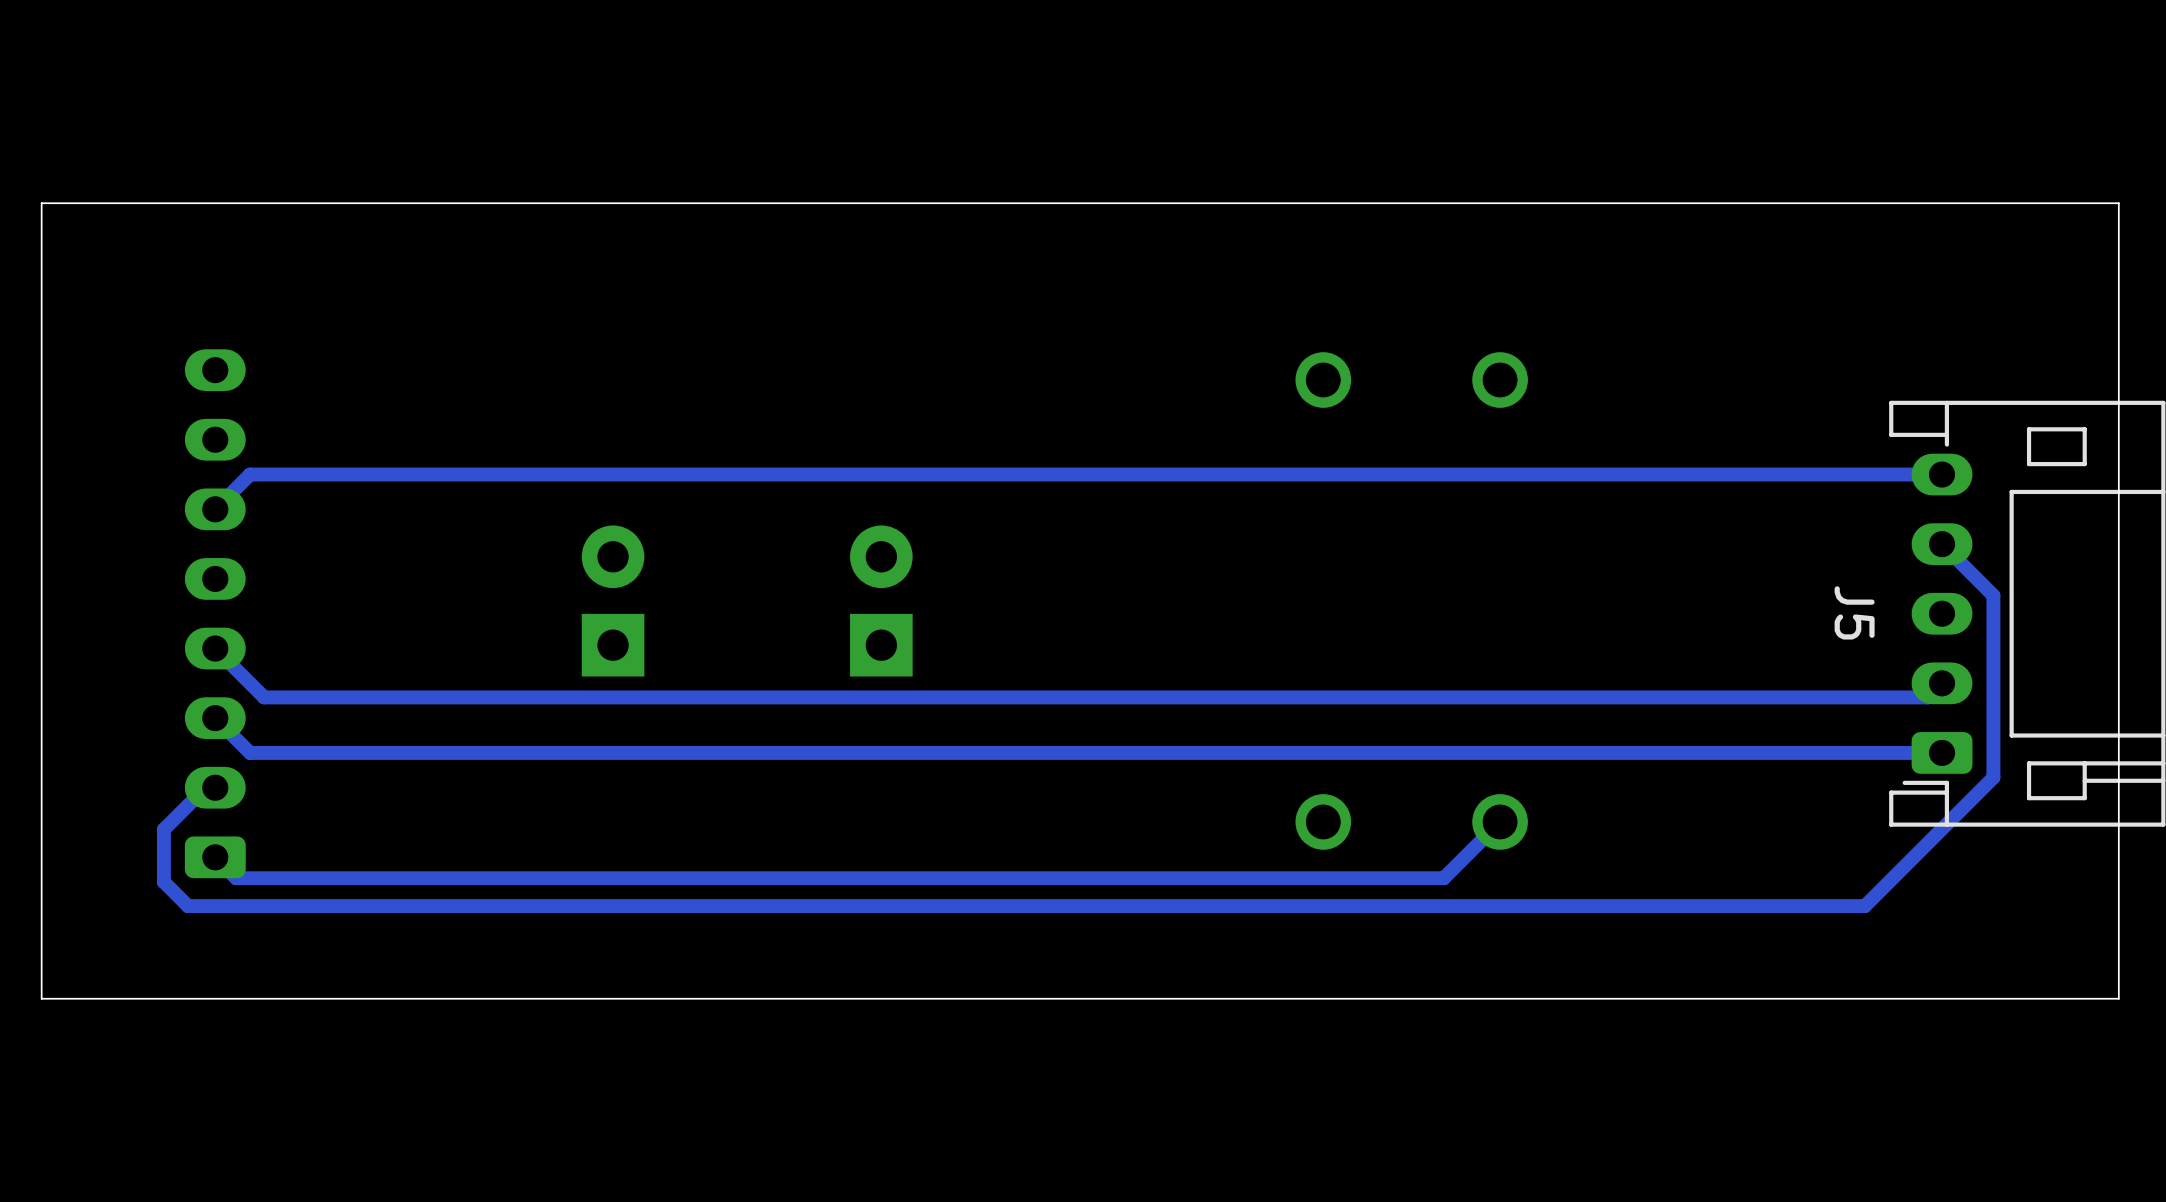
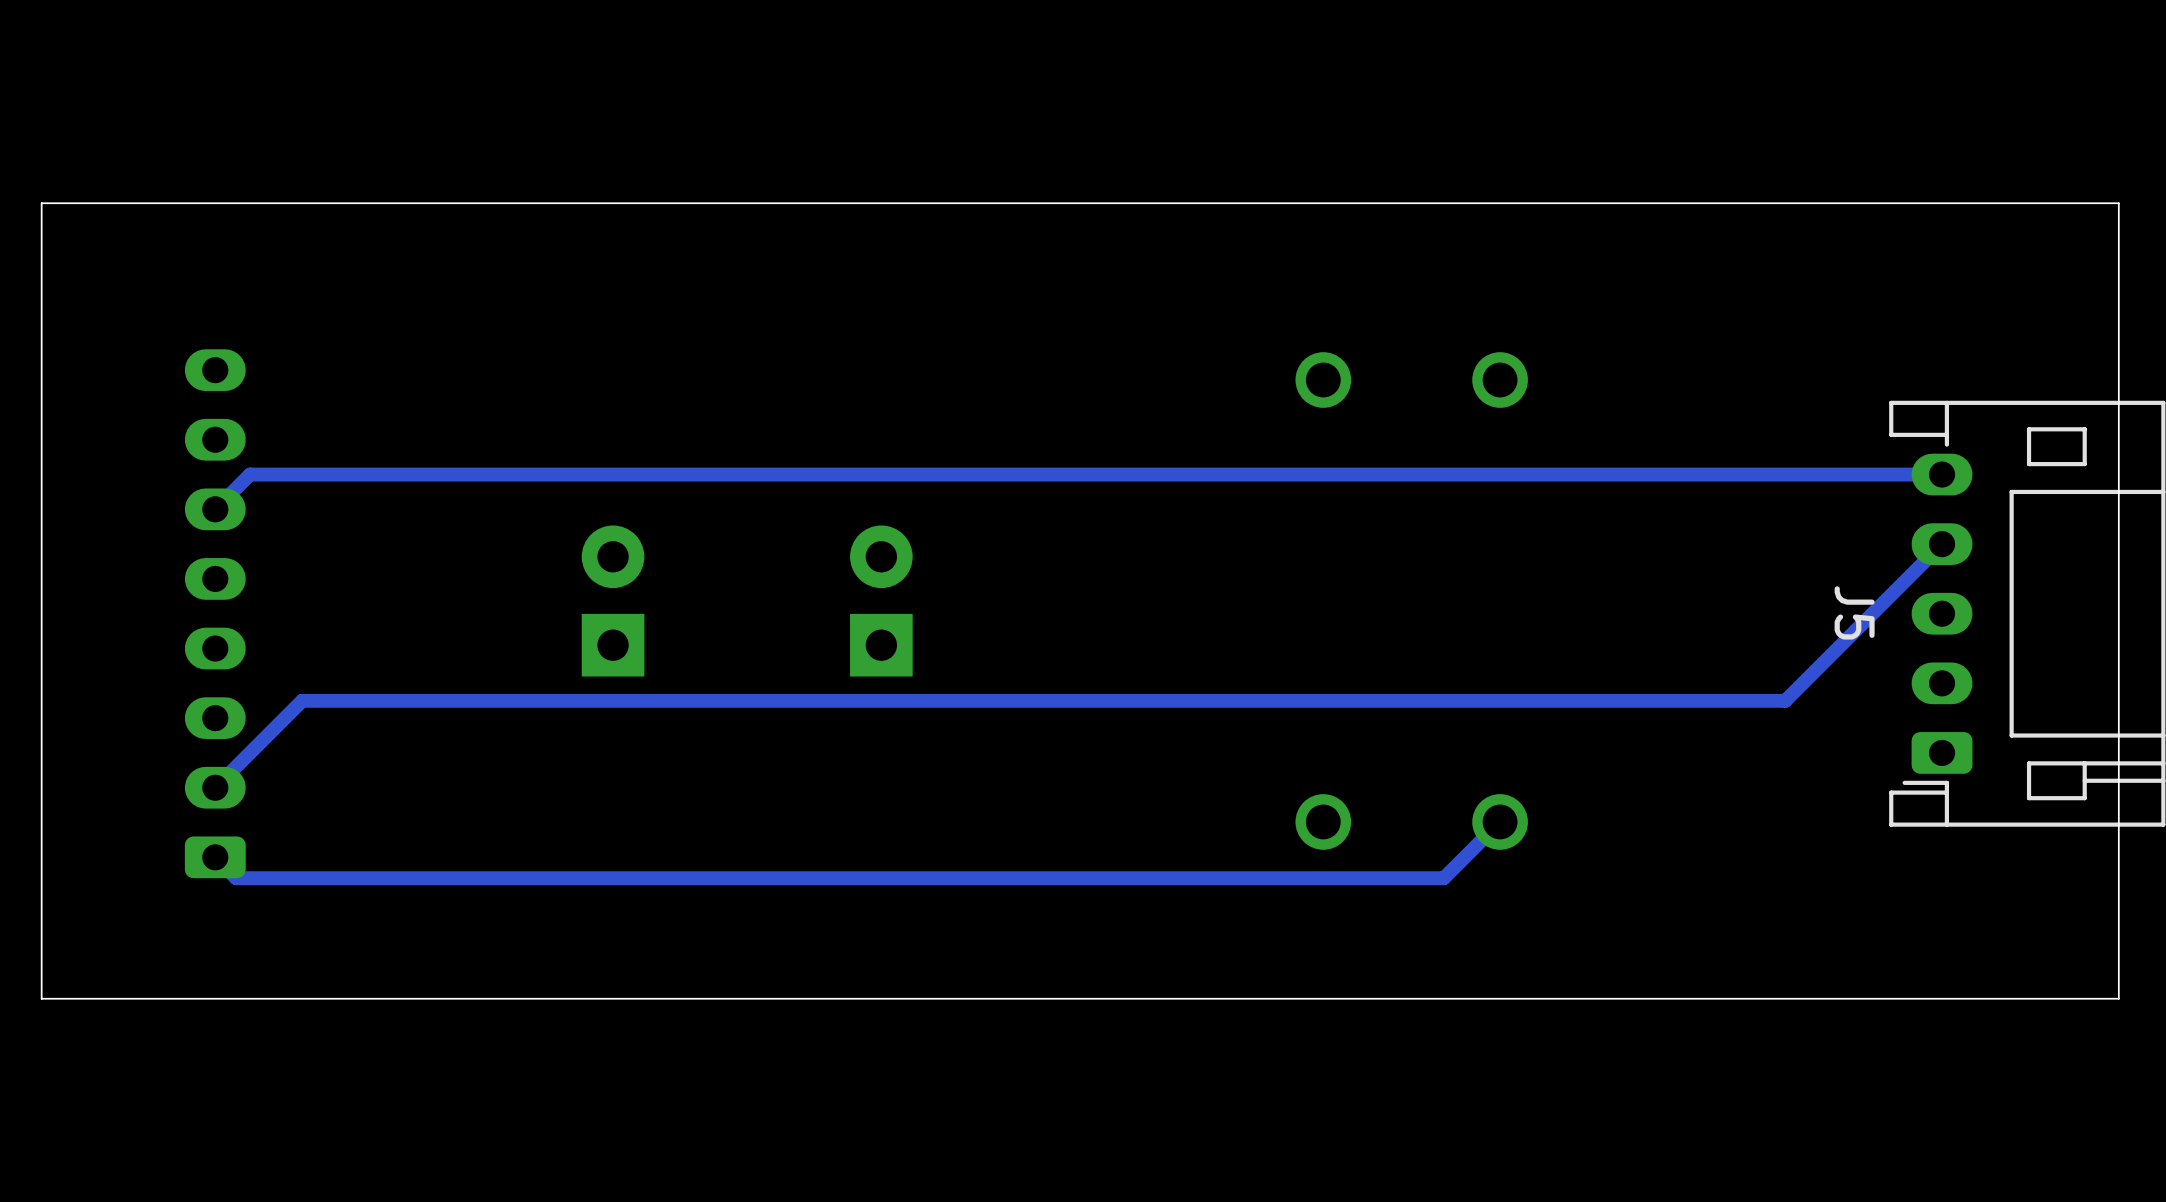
track: (1942, 544) (1993, 595) (1993, 777) (1864, 906) (188, 906) (163, 882) (163, 829) (205, 787) (215, 787) -> (1942, 544) (1785, 700) (302, 700) (215, 787)
track: (215, 648) (264, 697) (1927, 697) (1942, 683) -> none
track: (215, 718) (250, 752) (1942, 752) -> none

